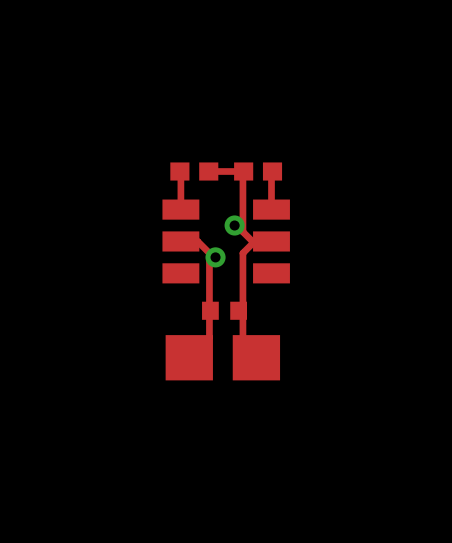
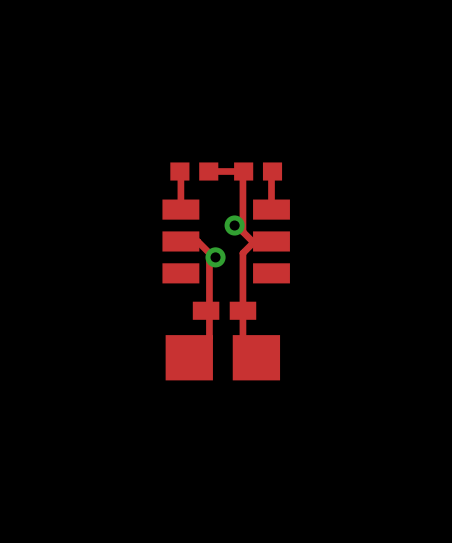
part footprint: [202, 301, 248, 320] -> [192, 301, 257, 320]

